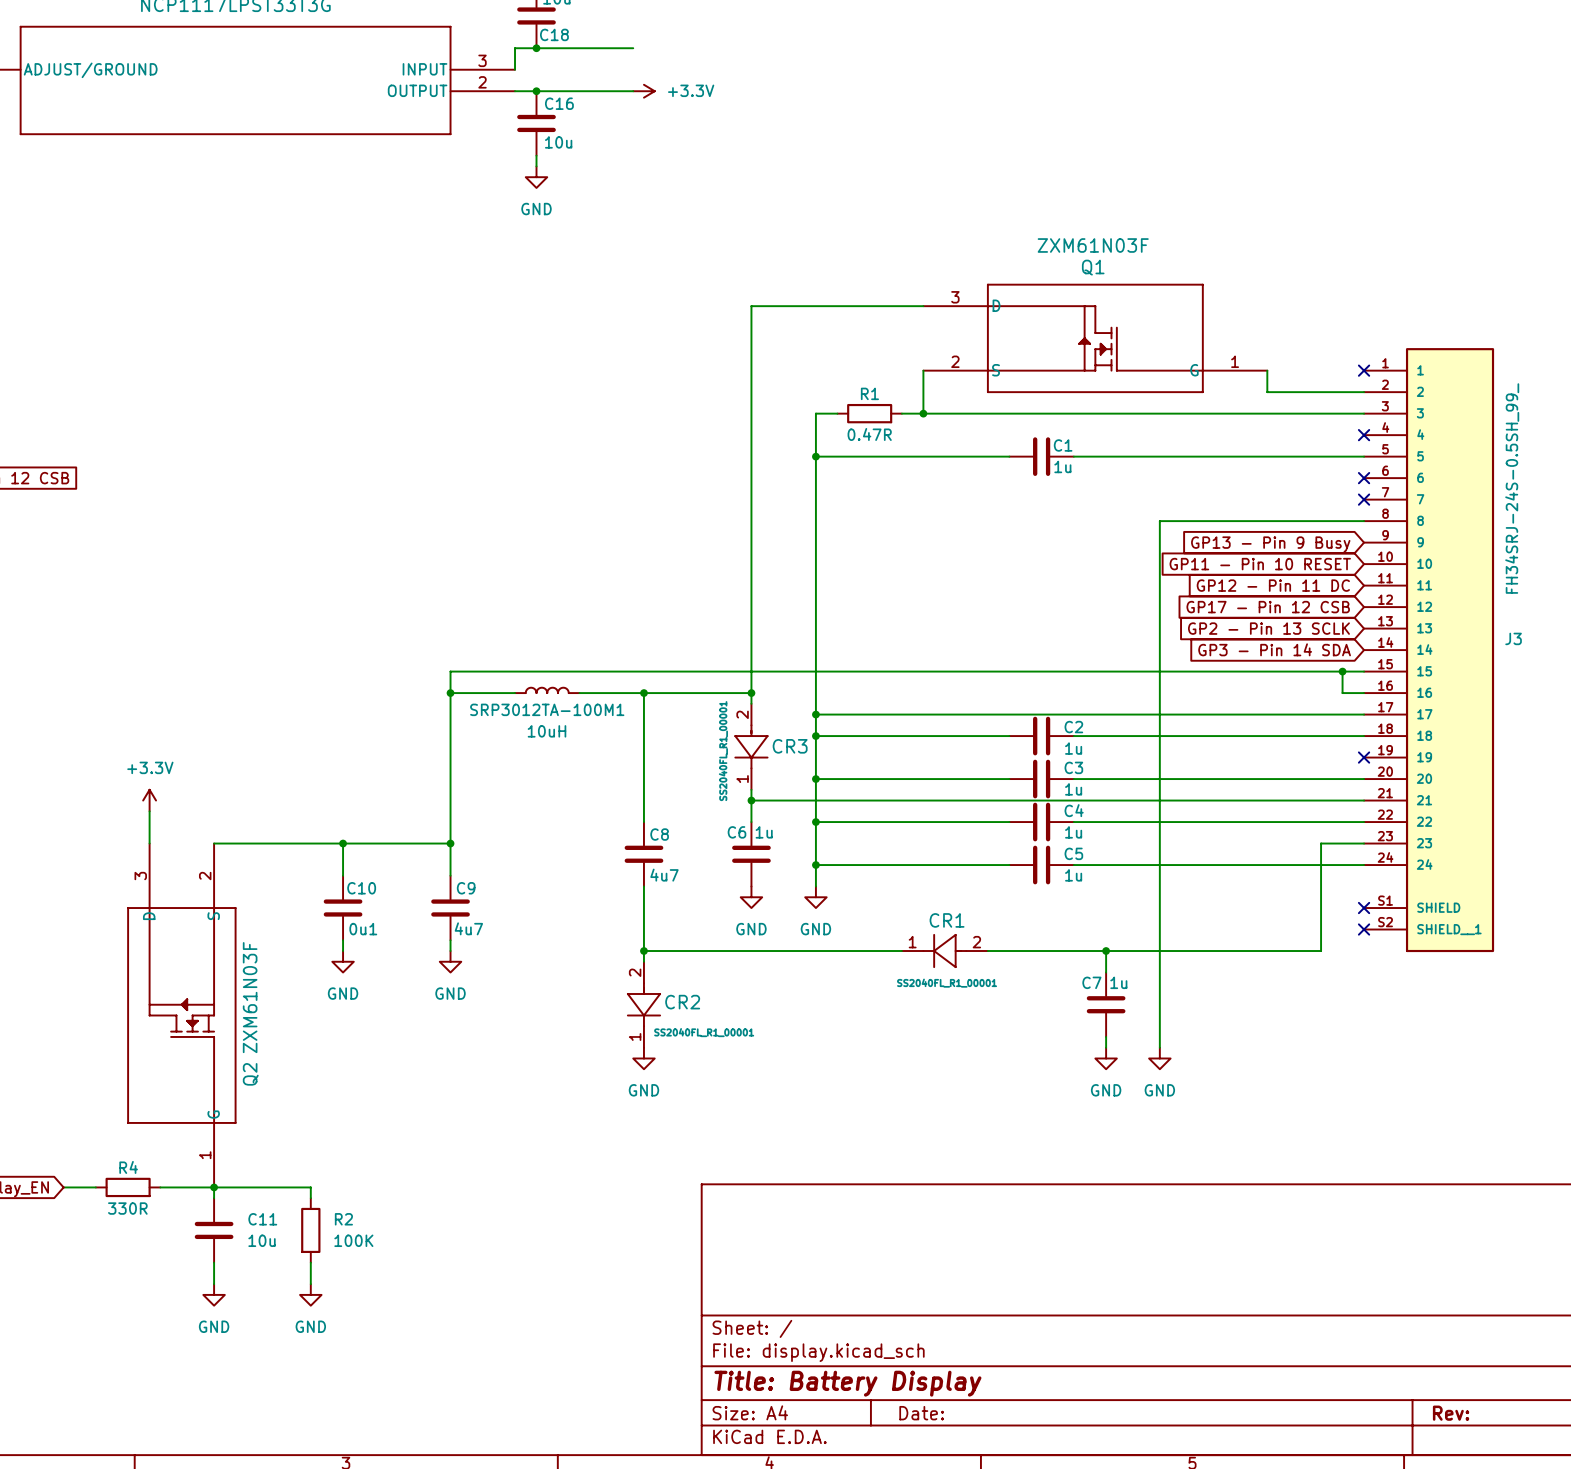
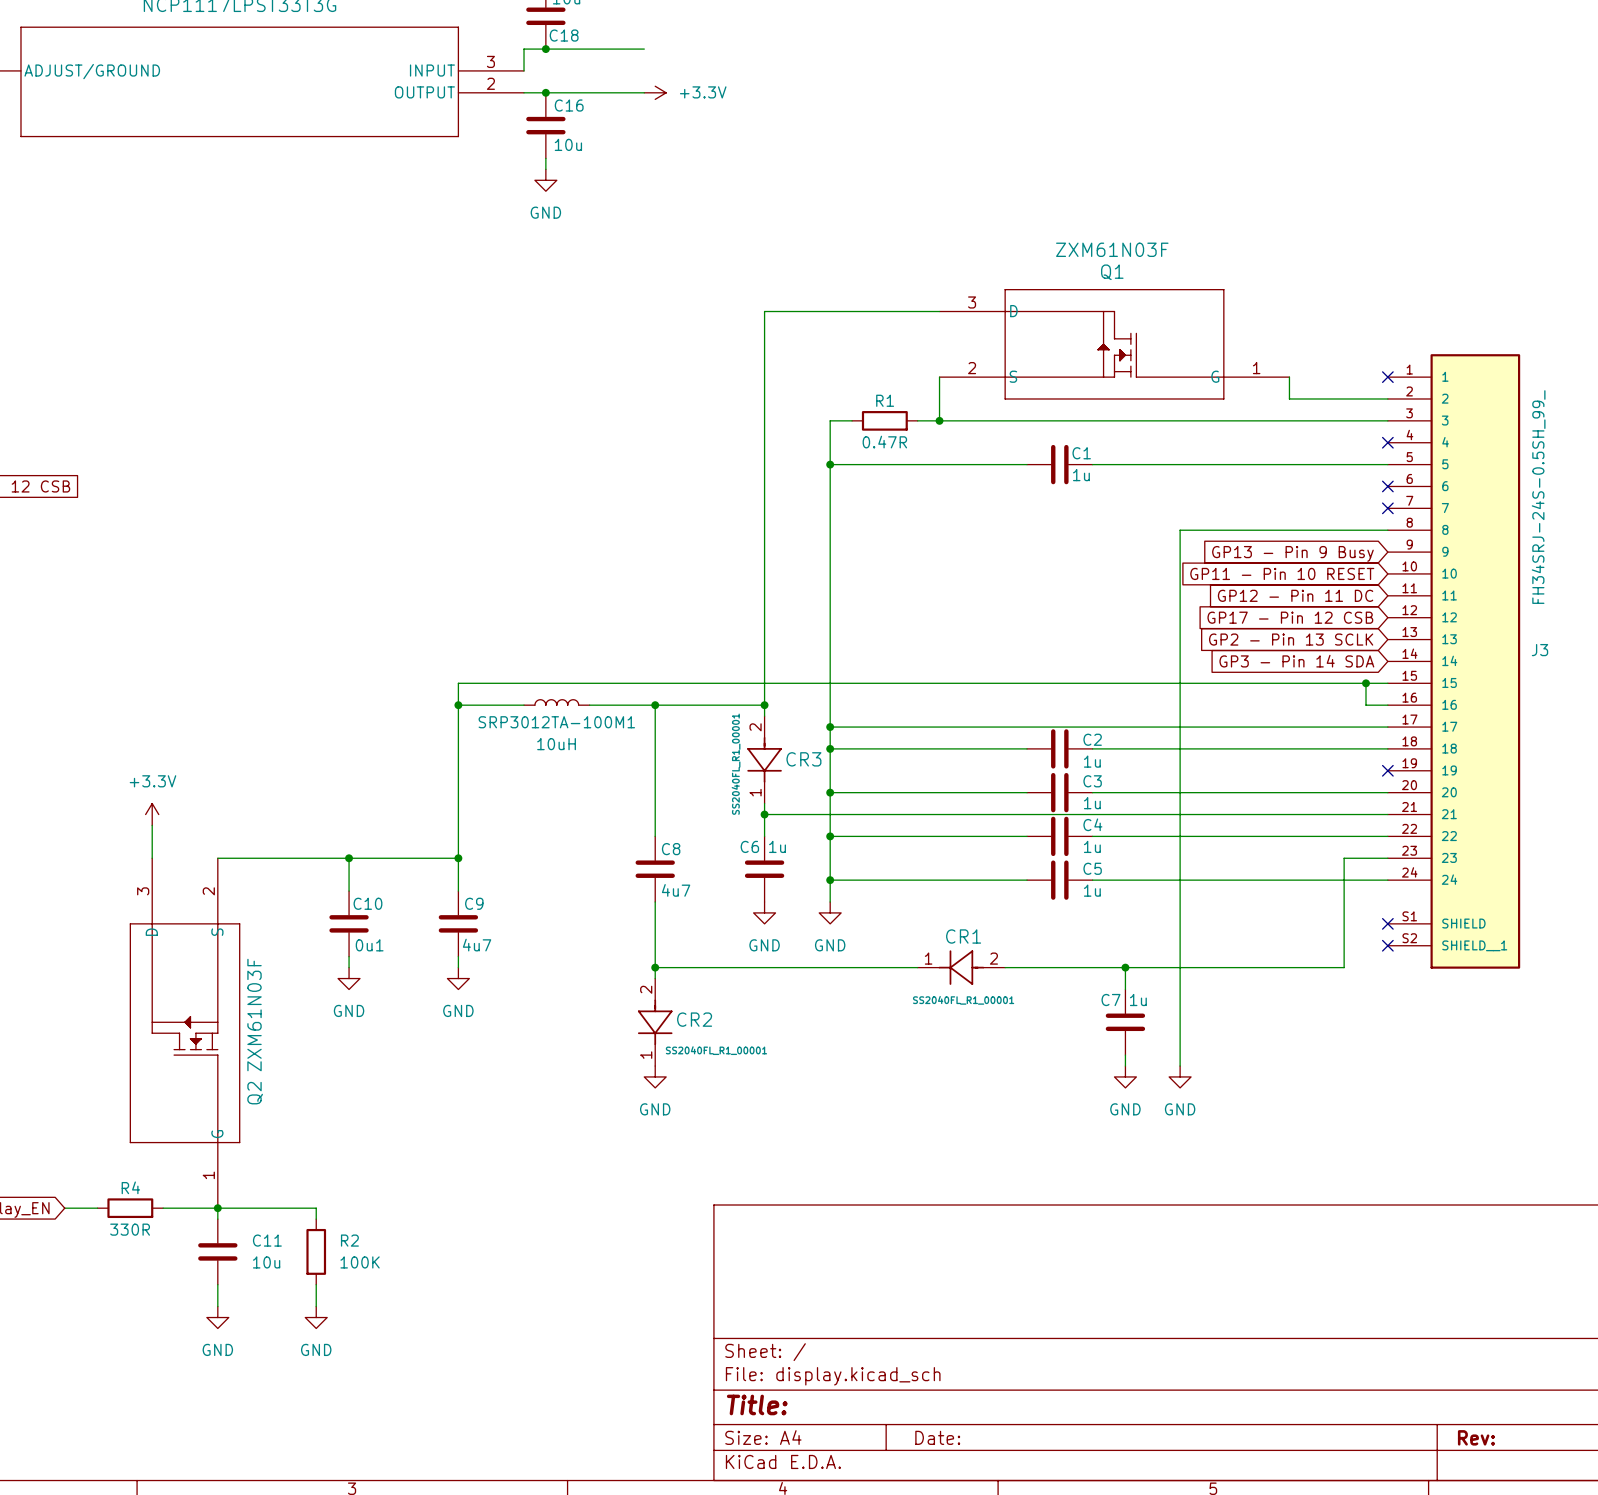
title block: Title: Battery Display (847, 1383) -> Title: (757, 1404)

